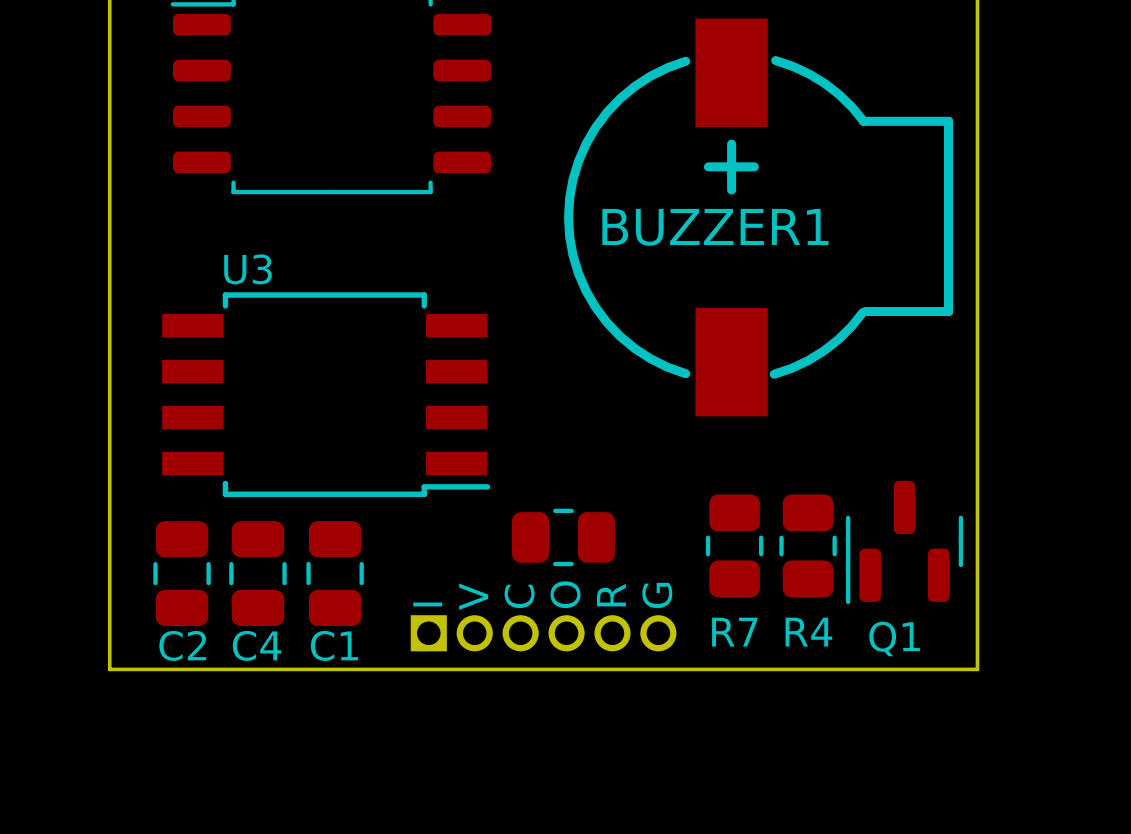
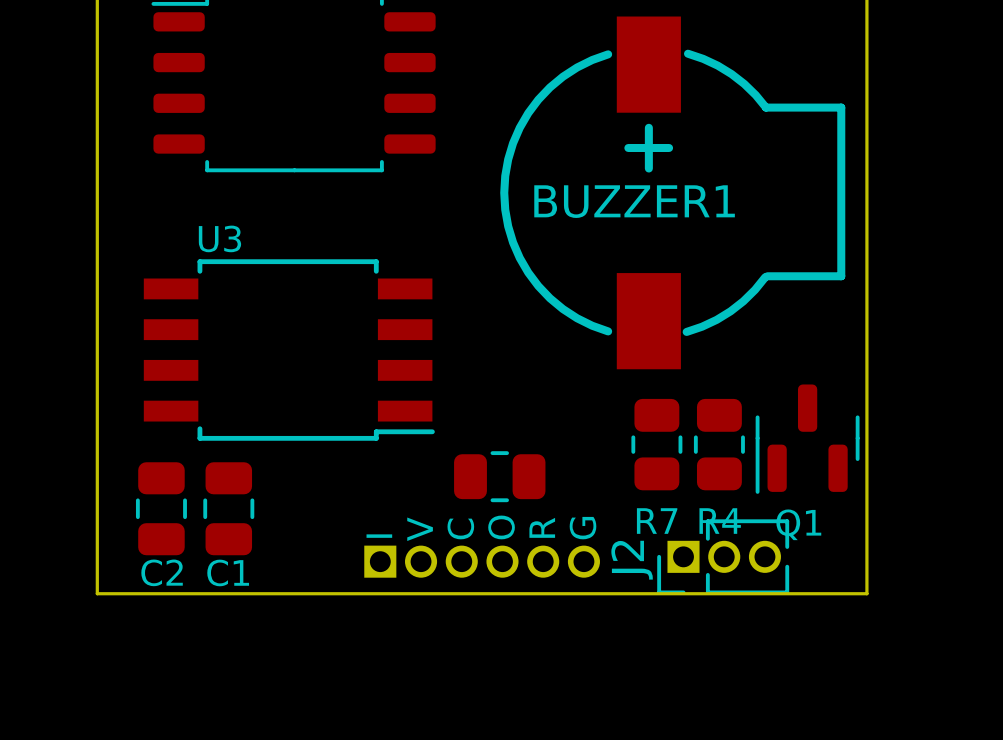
Q1 position: (904, 542) -> (807, 439)
R7 position: (734, 545) -> (656, 444)
R4 position: (808, 545) -> (719, 444)
C1: (335, 573) -> none
J2: none -> (723, 556)
C4 name: C4 (257, 645) -> C1 (228, 572)

